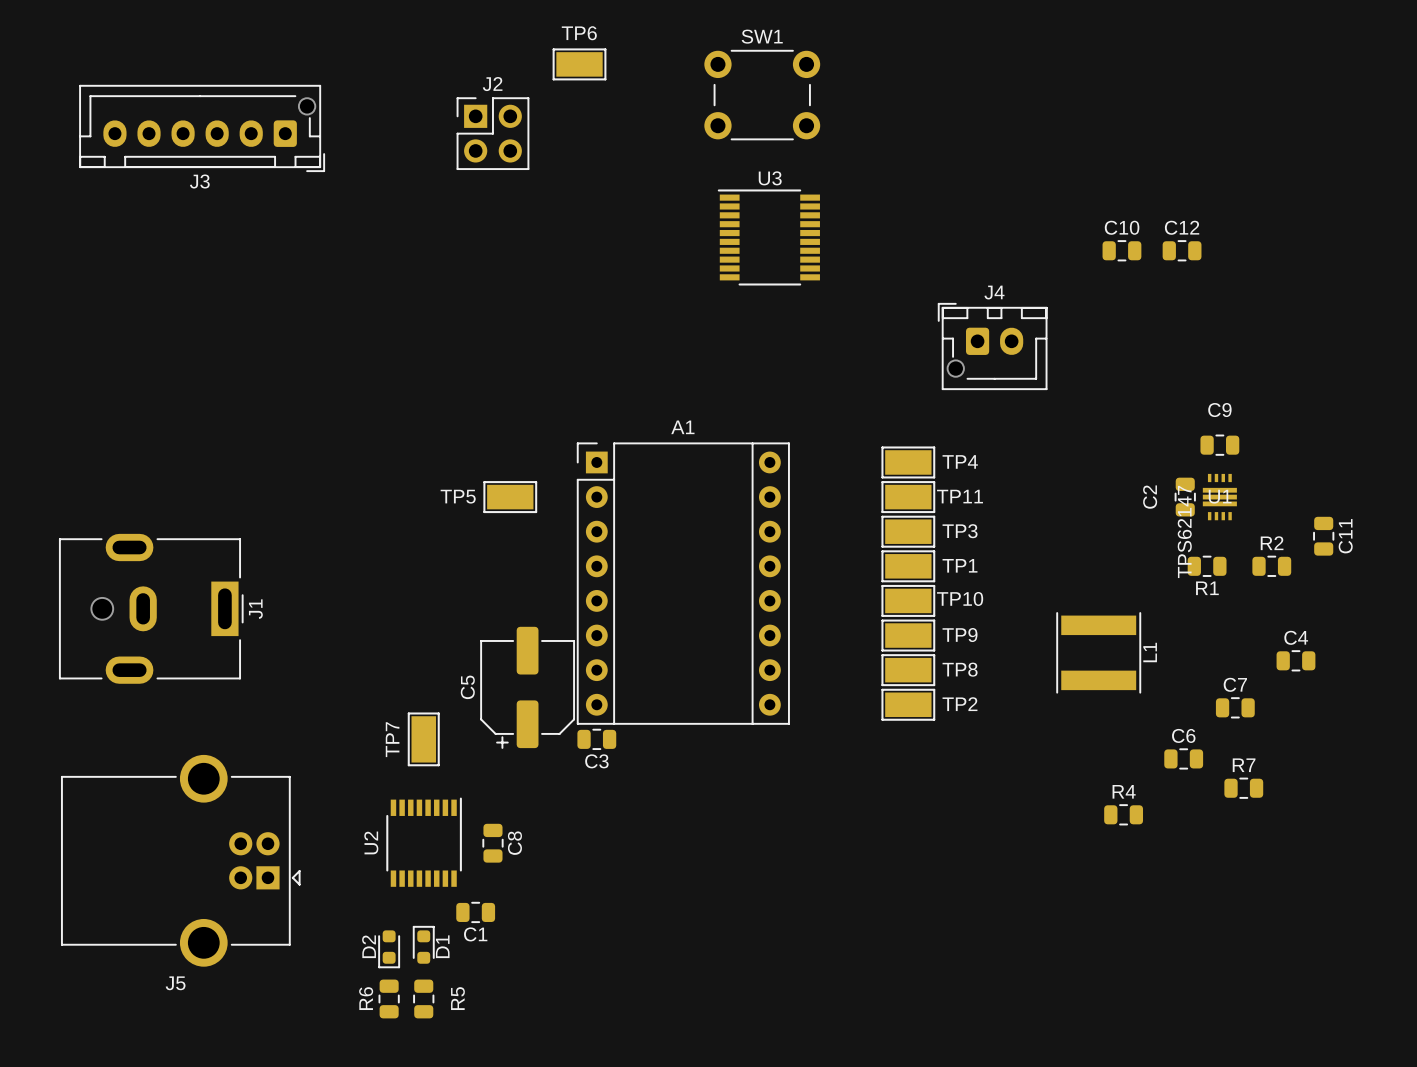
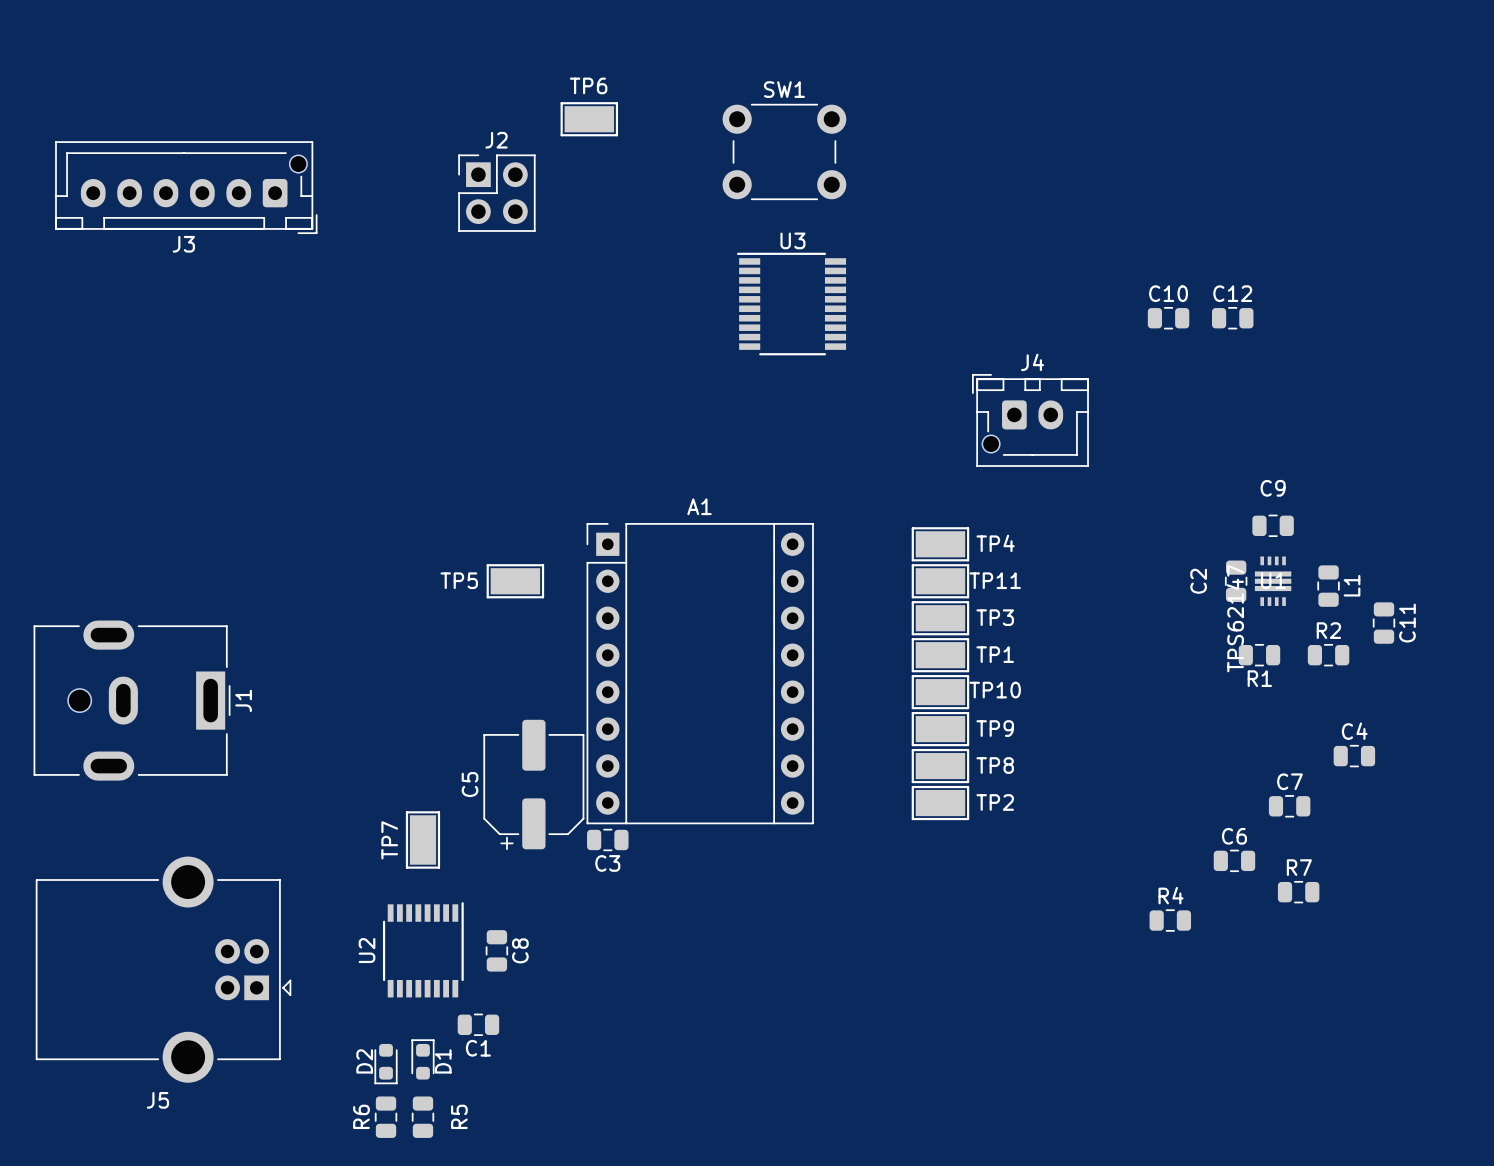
L1 footprint: [1056, 612, 1142, 694] -> [1317, 565, 1340, 607]
L1 name position: L1 (1150, 652) -> L1 (1352, 585)

